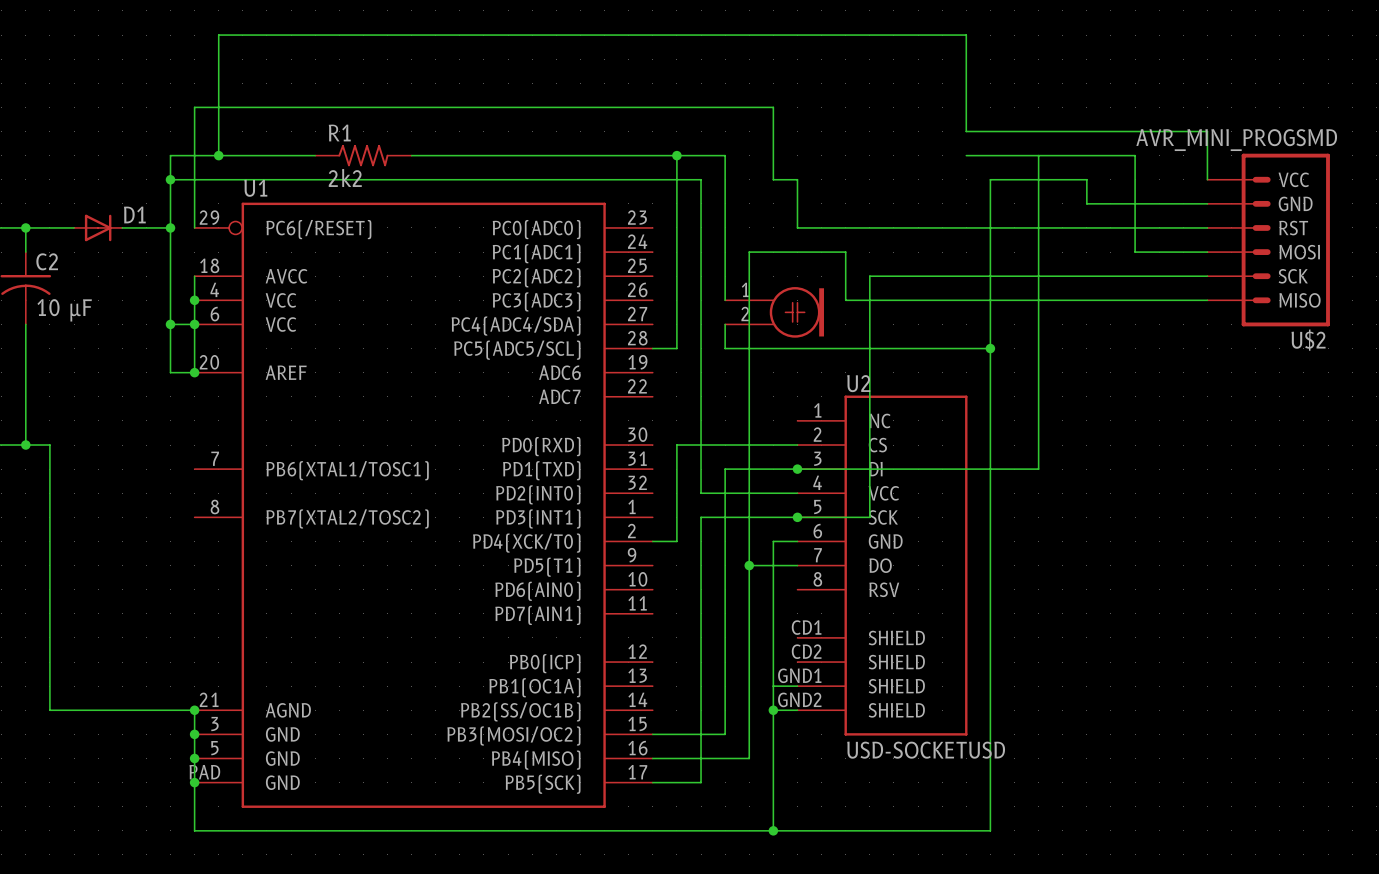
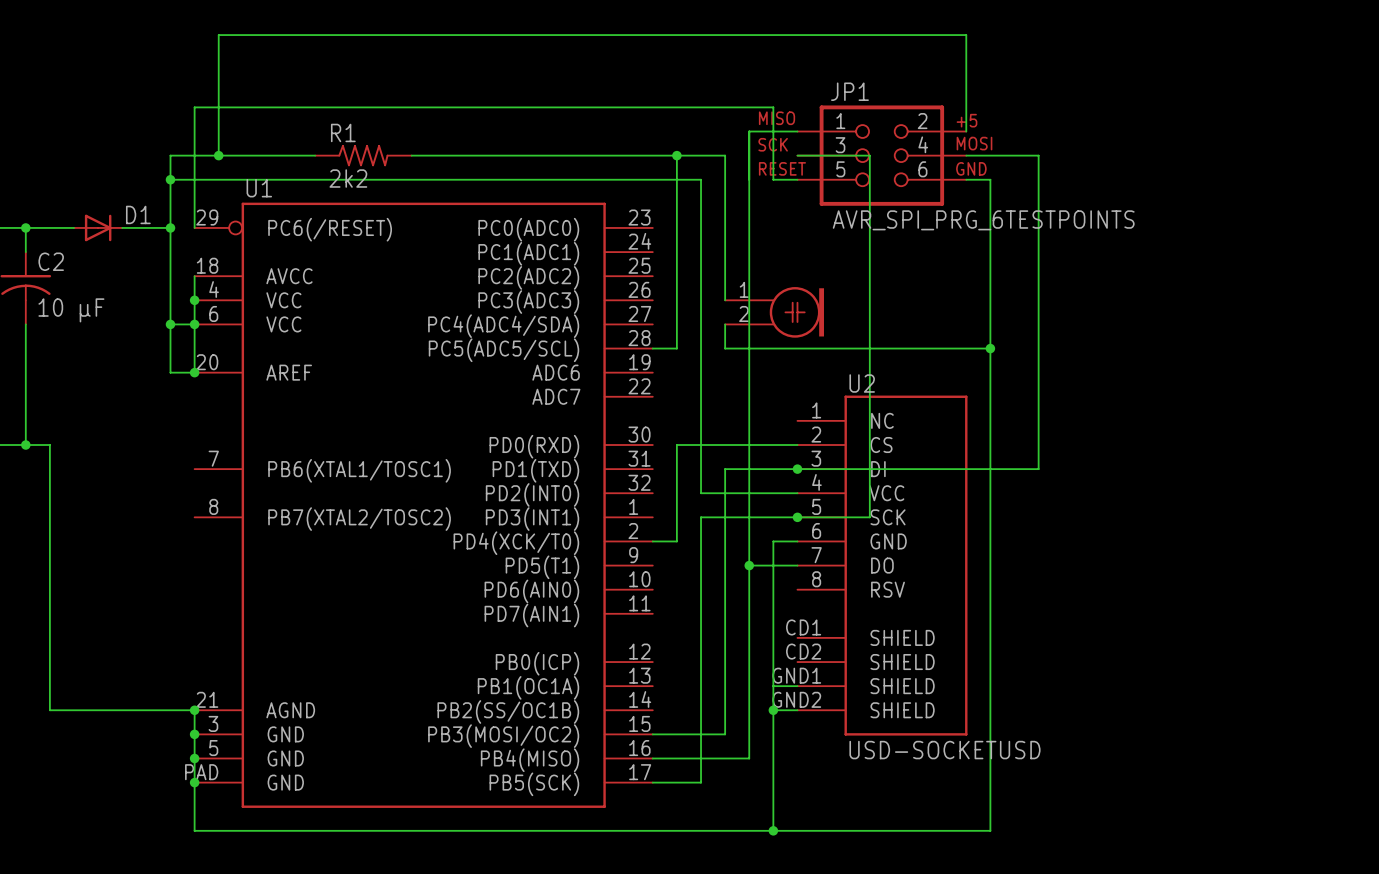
wire: (966, 131) (1207, 131) (1207, 179) -> none
JP1: none -> AVR_SPI_PRG_6TESTPOINTS (881, 155)
wire: (1038, 155) (1135, 155) (1135, 252) (1207, 252) -> none
wire: (797, 179) (797, 227) (1207, 227) -> none
wire: (990, 179) (1086, 179) (1086, 203) (1207, 203) -> (990, 179) (966, 179)
U$2: AVR_MINI_PROGSMD (1268, 240) -> none
wire: (749, 252) (845, 252) (845, 300) (1207, 300) -> (749, 252) (749, 131) (797, 131)
wire: (869, 276) (1207, 276) -> (869, 276) (869, 155) (797, 155)

